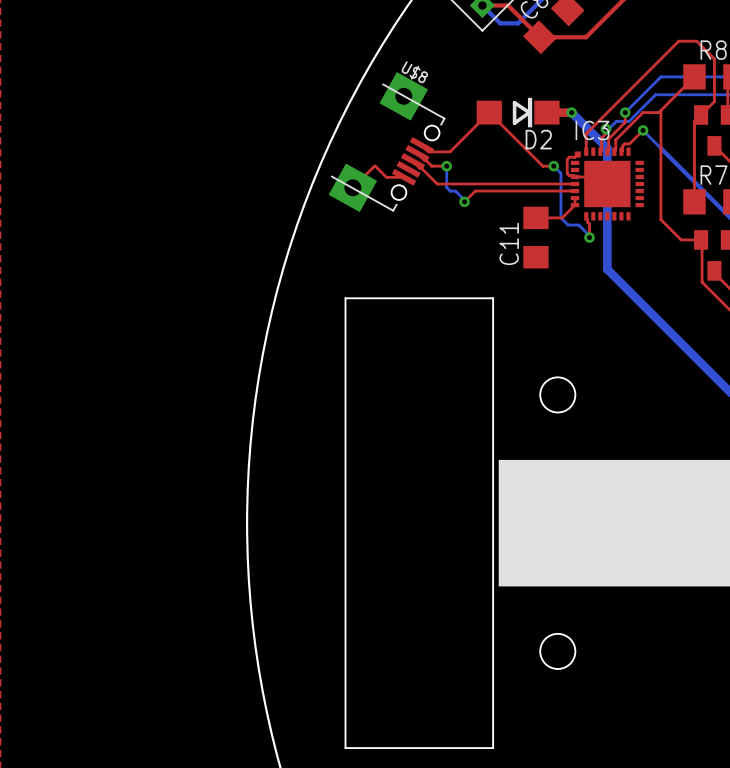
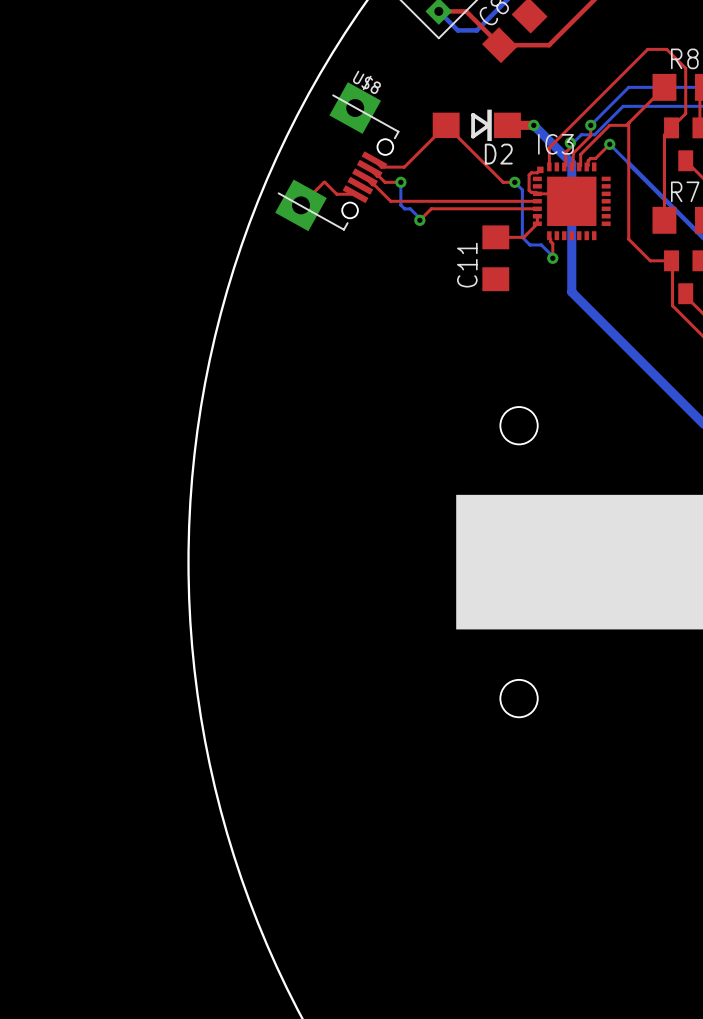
board edge: (345, 298) (345, 748) (493, 748) (493, 298) (345, 298) -> none

